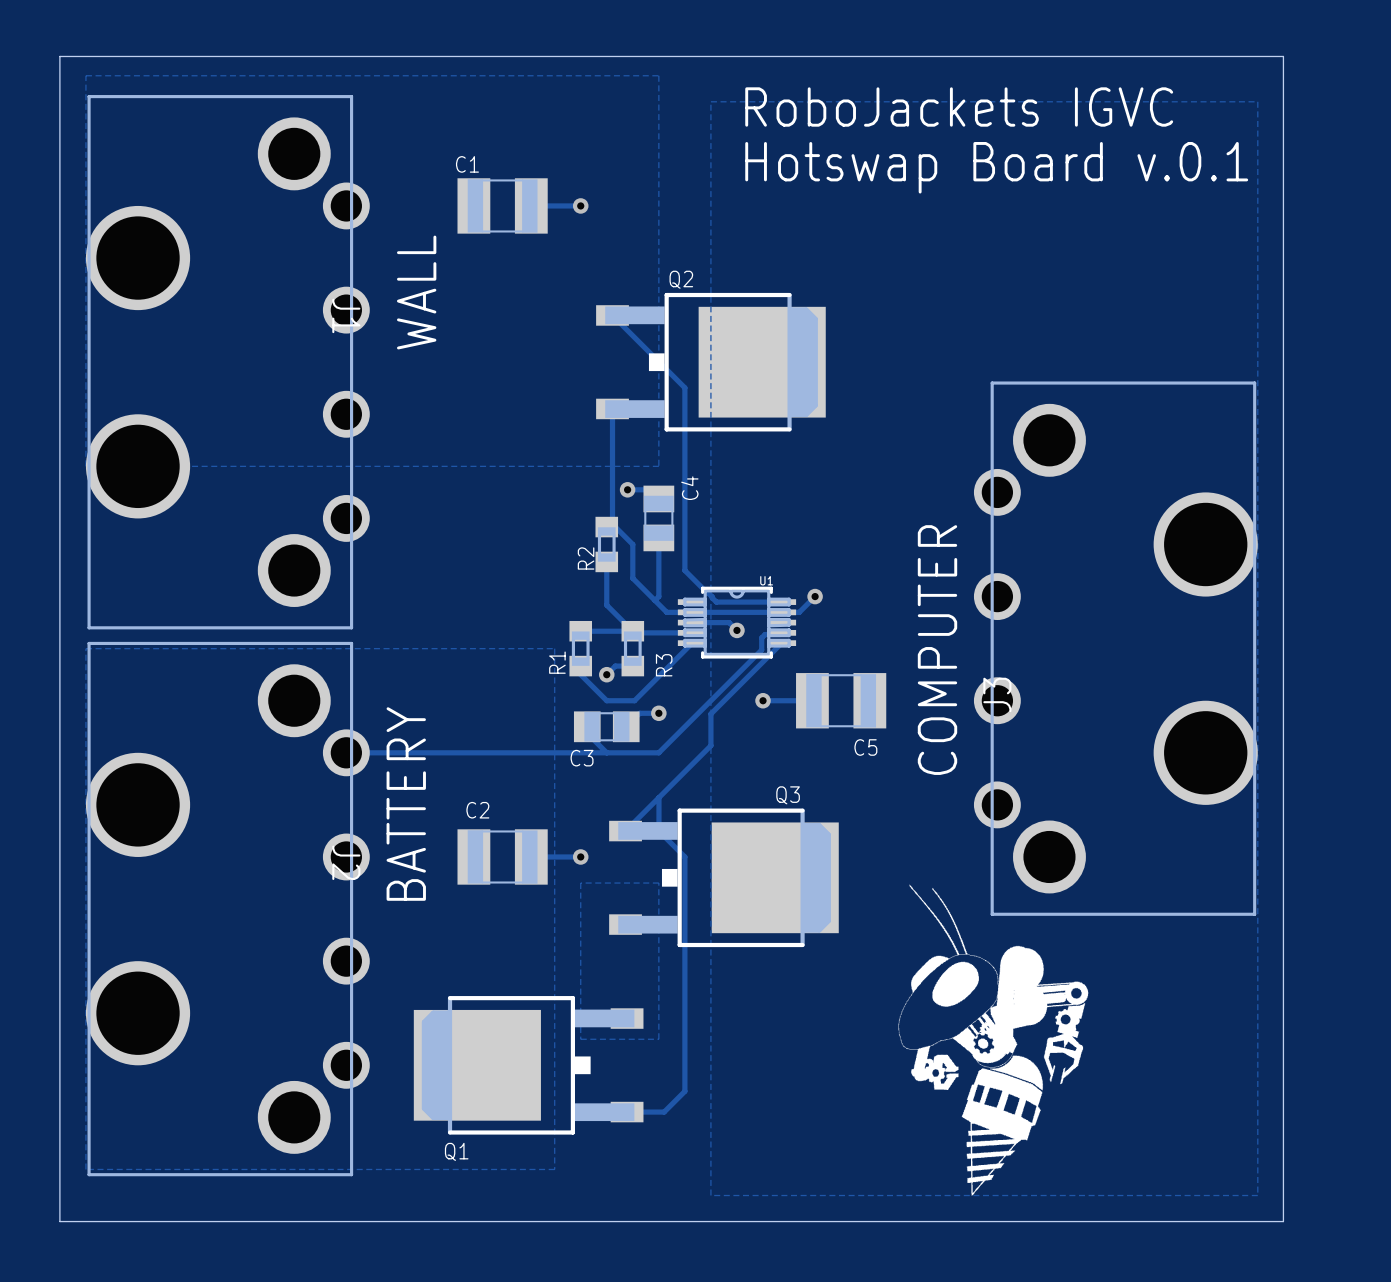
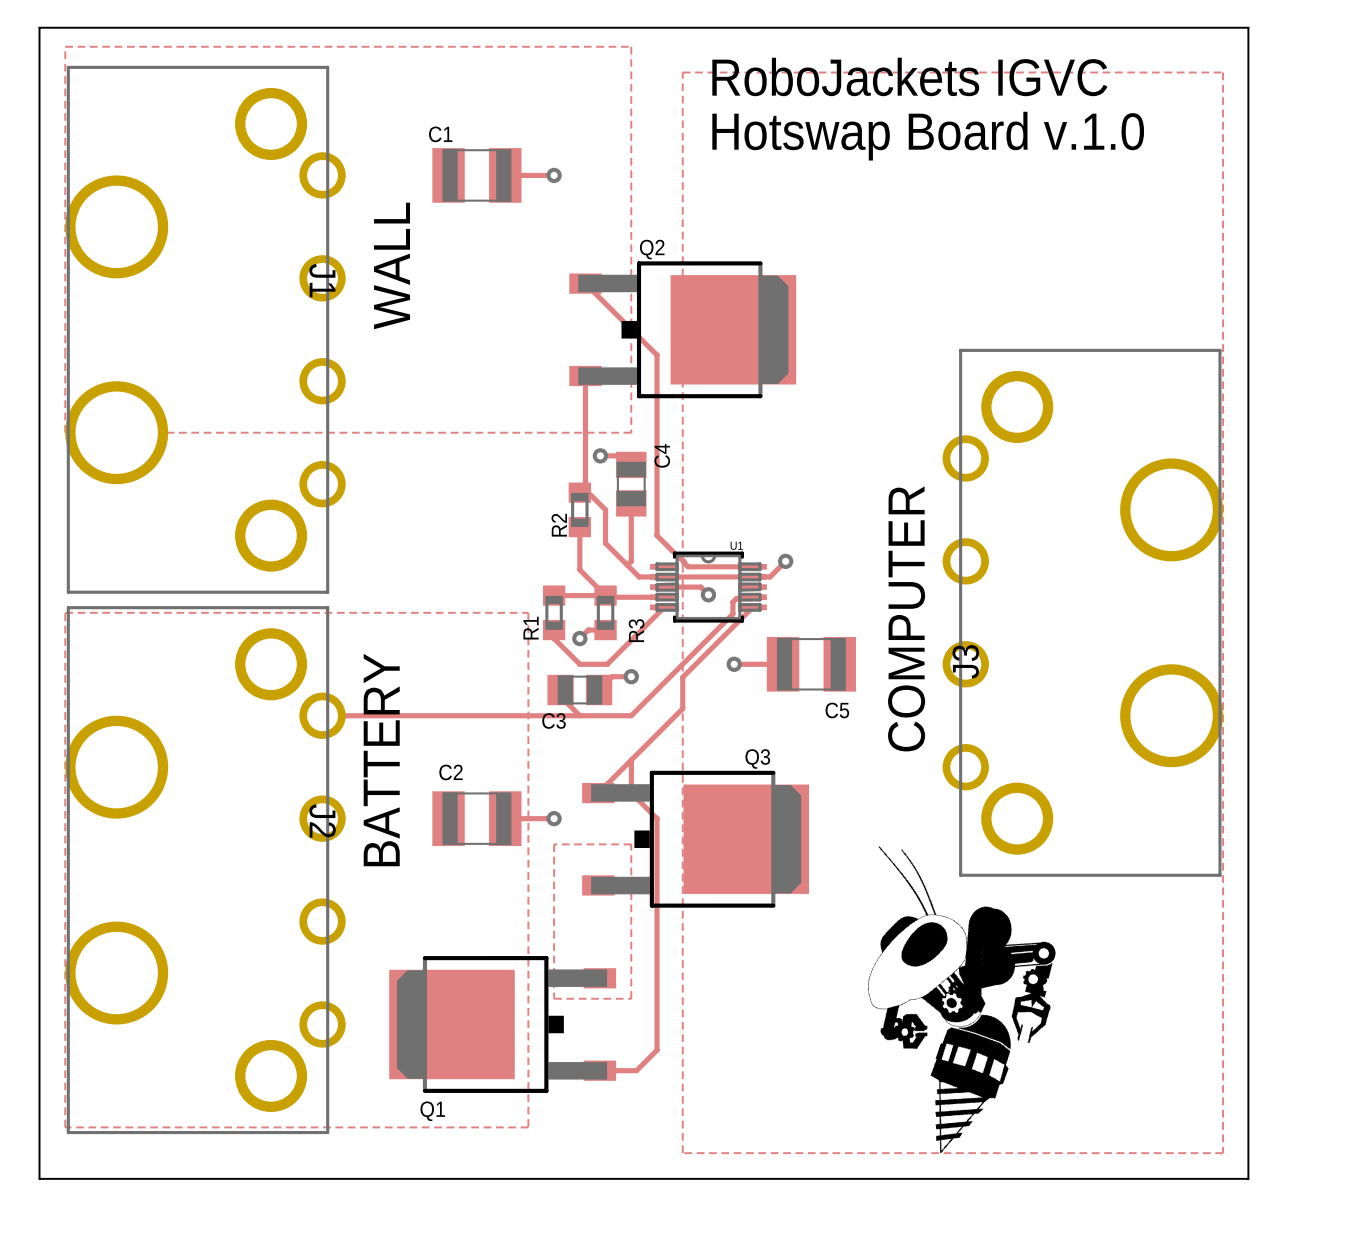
text: Hotswap Board v.0.1 (996, 167) -> Hotswap Board v.1.0 (928, 136)

